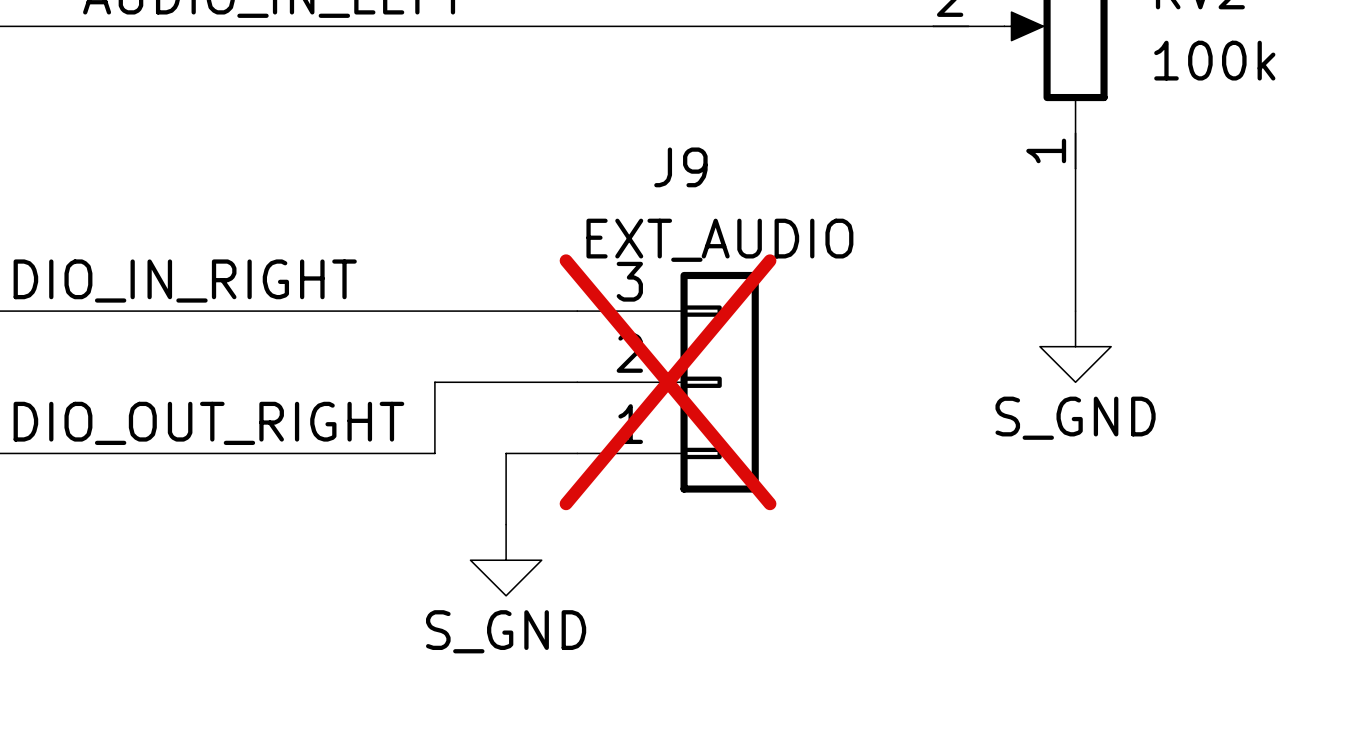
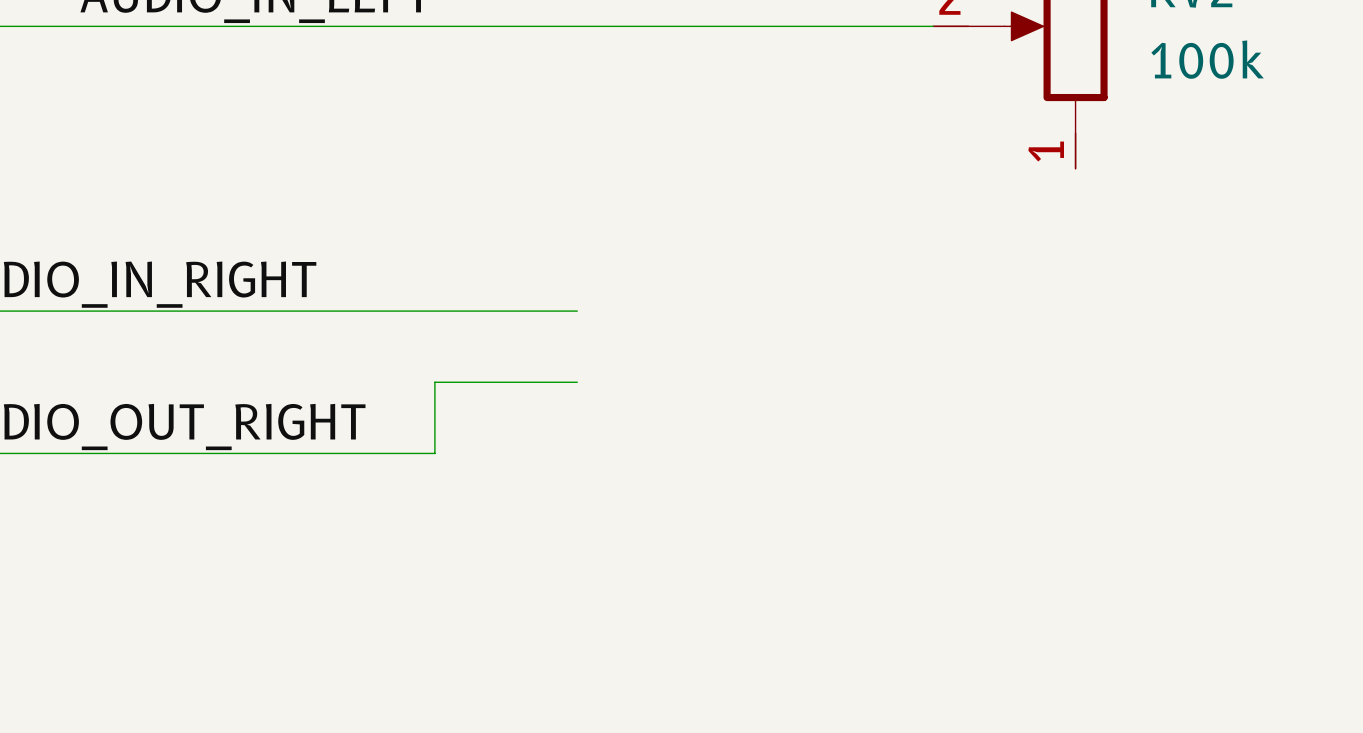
wire: (1075, 168) (1075, 311) -> none
power symbol: S_GND (1075, 346) -> none
J9: EXT_AUDIO (668, 382) -> none
wire: (577, 453) (506, 453) (506, 524) -> none
power symbol: S_GND (506, 560) -> none

